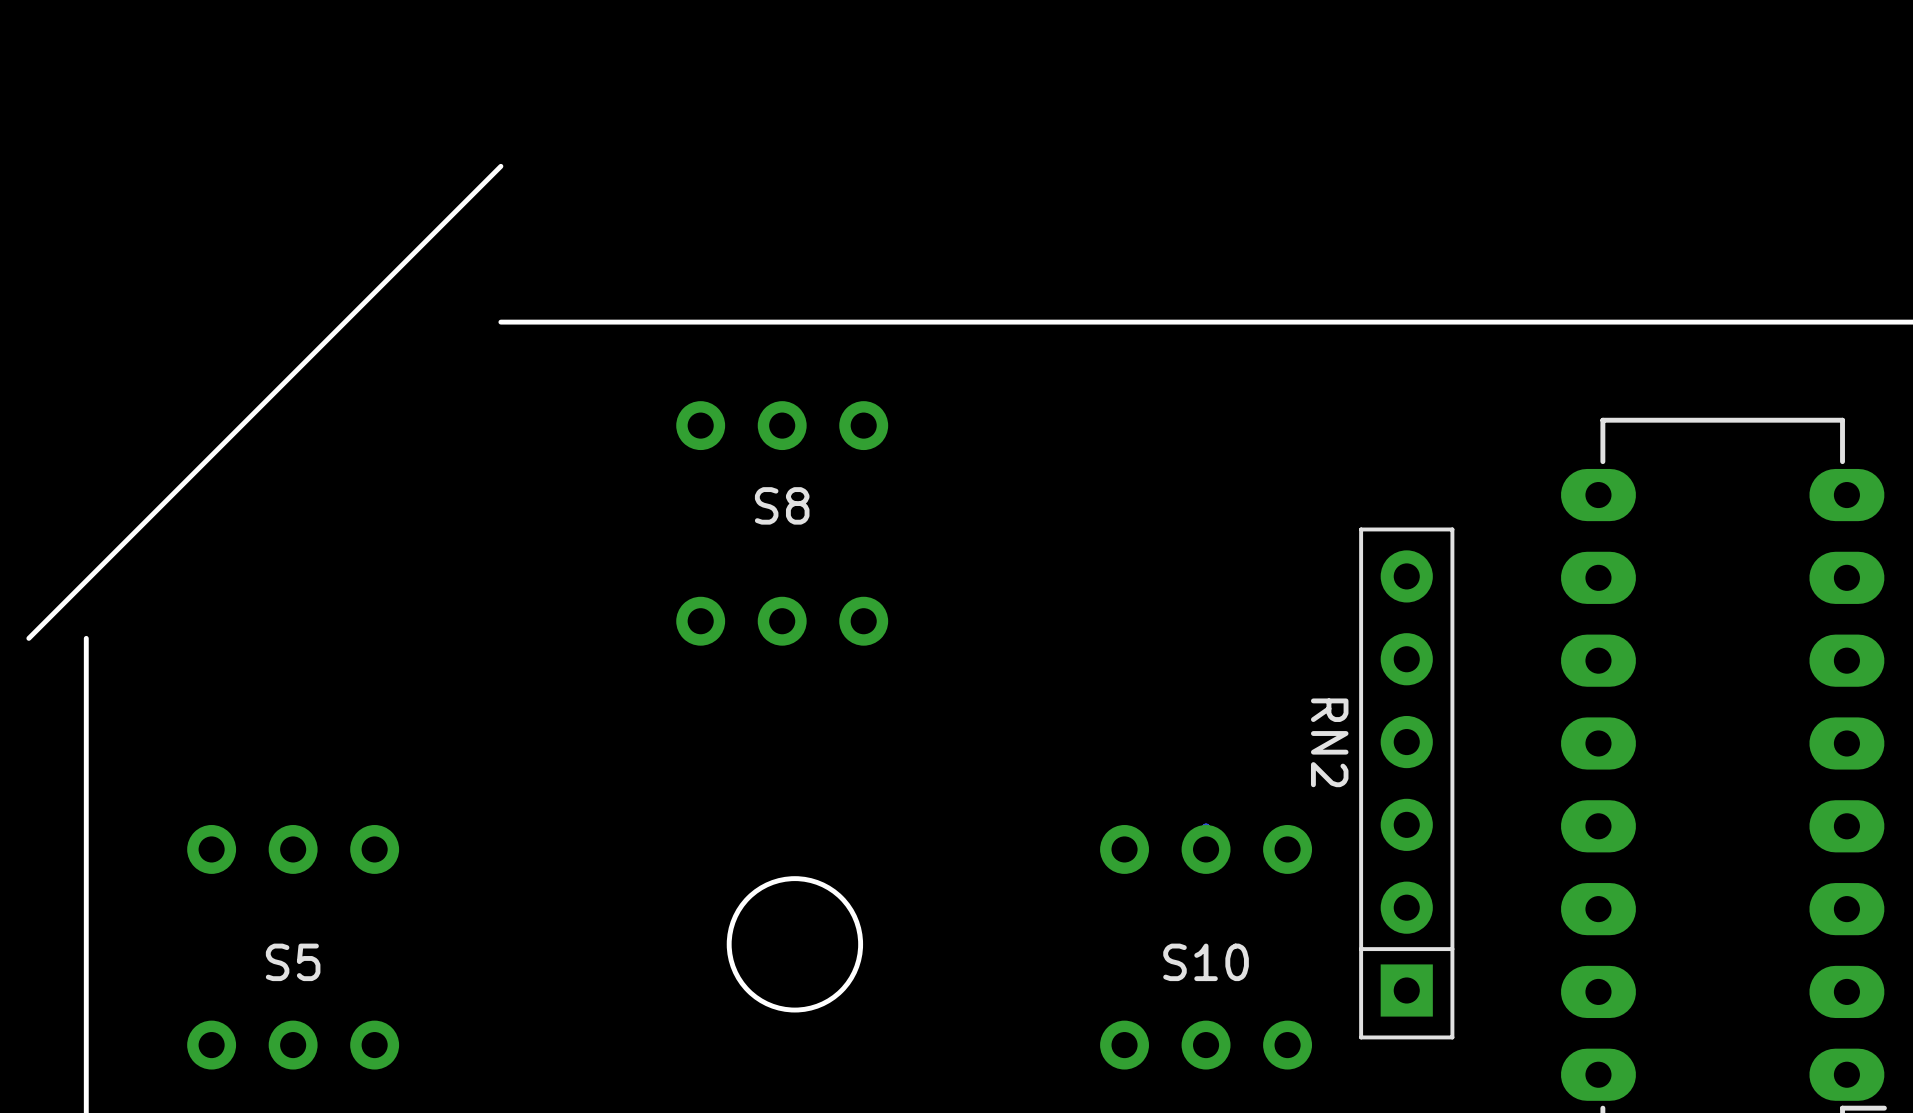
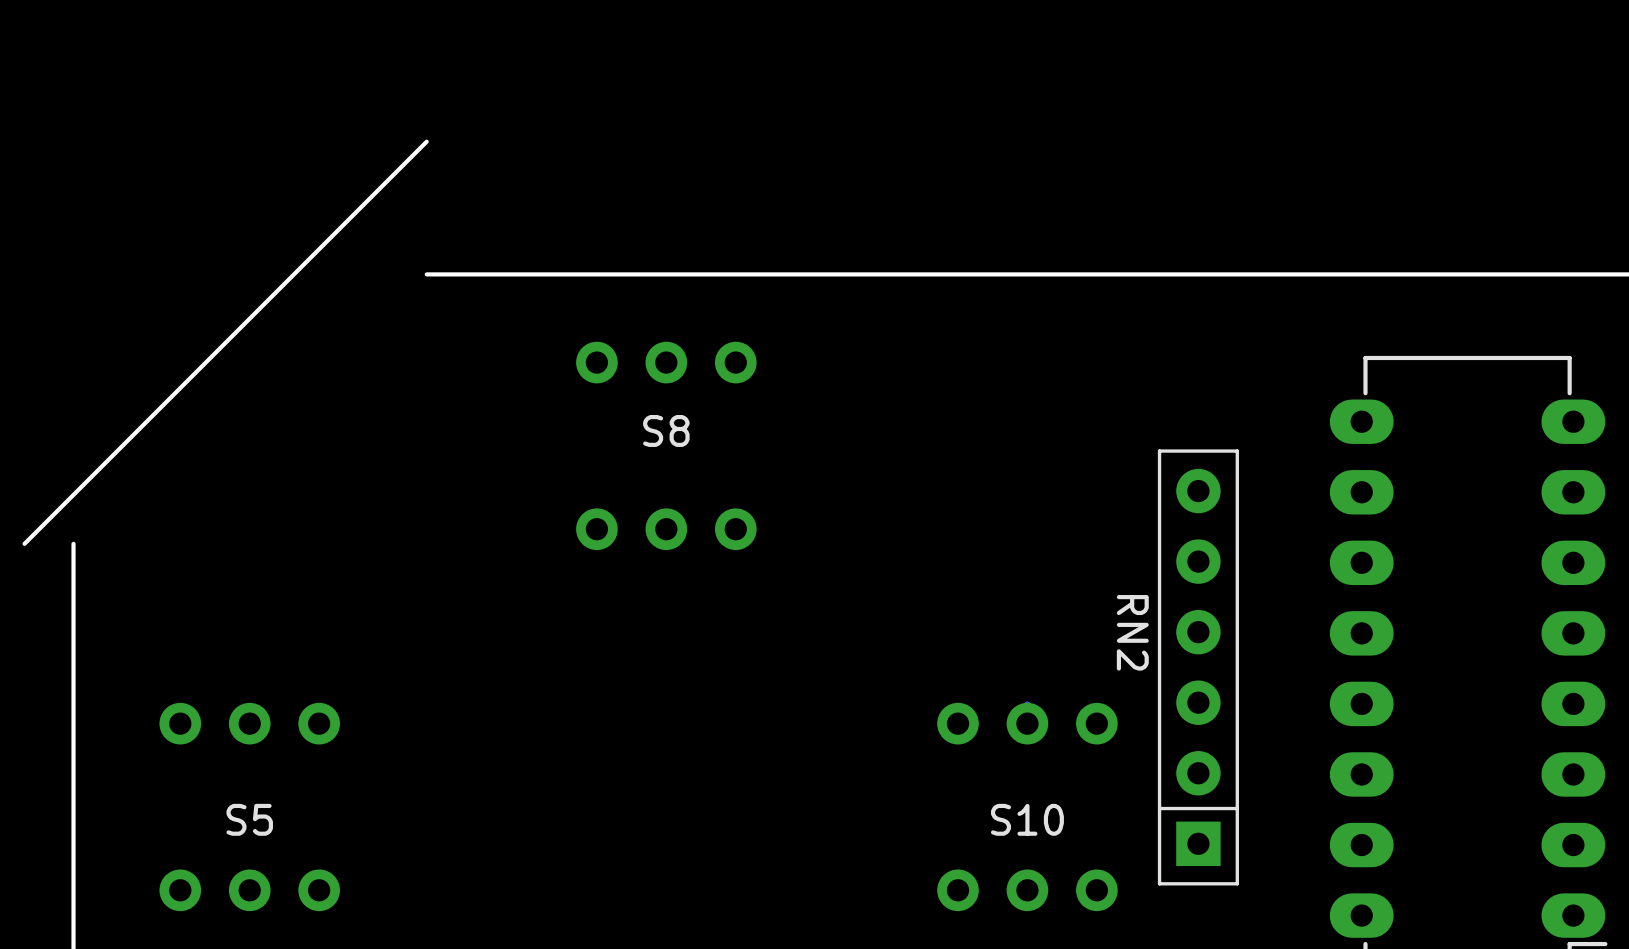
round board edge: [726, 876, 864, 1013] -> none

